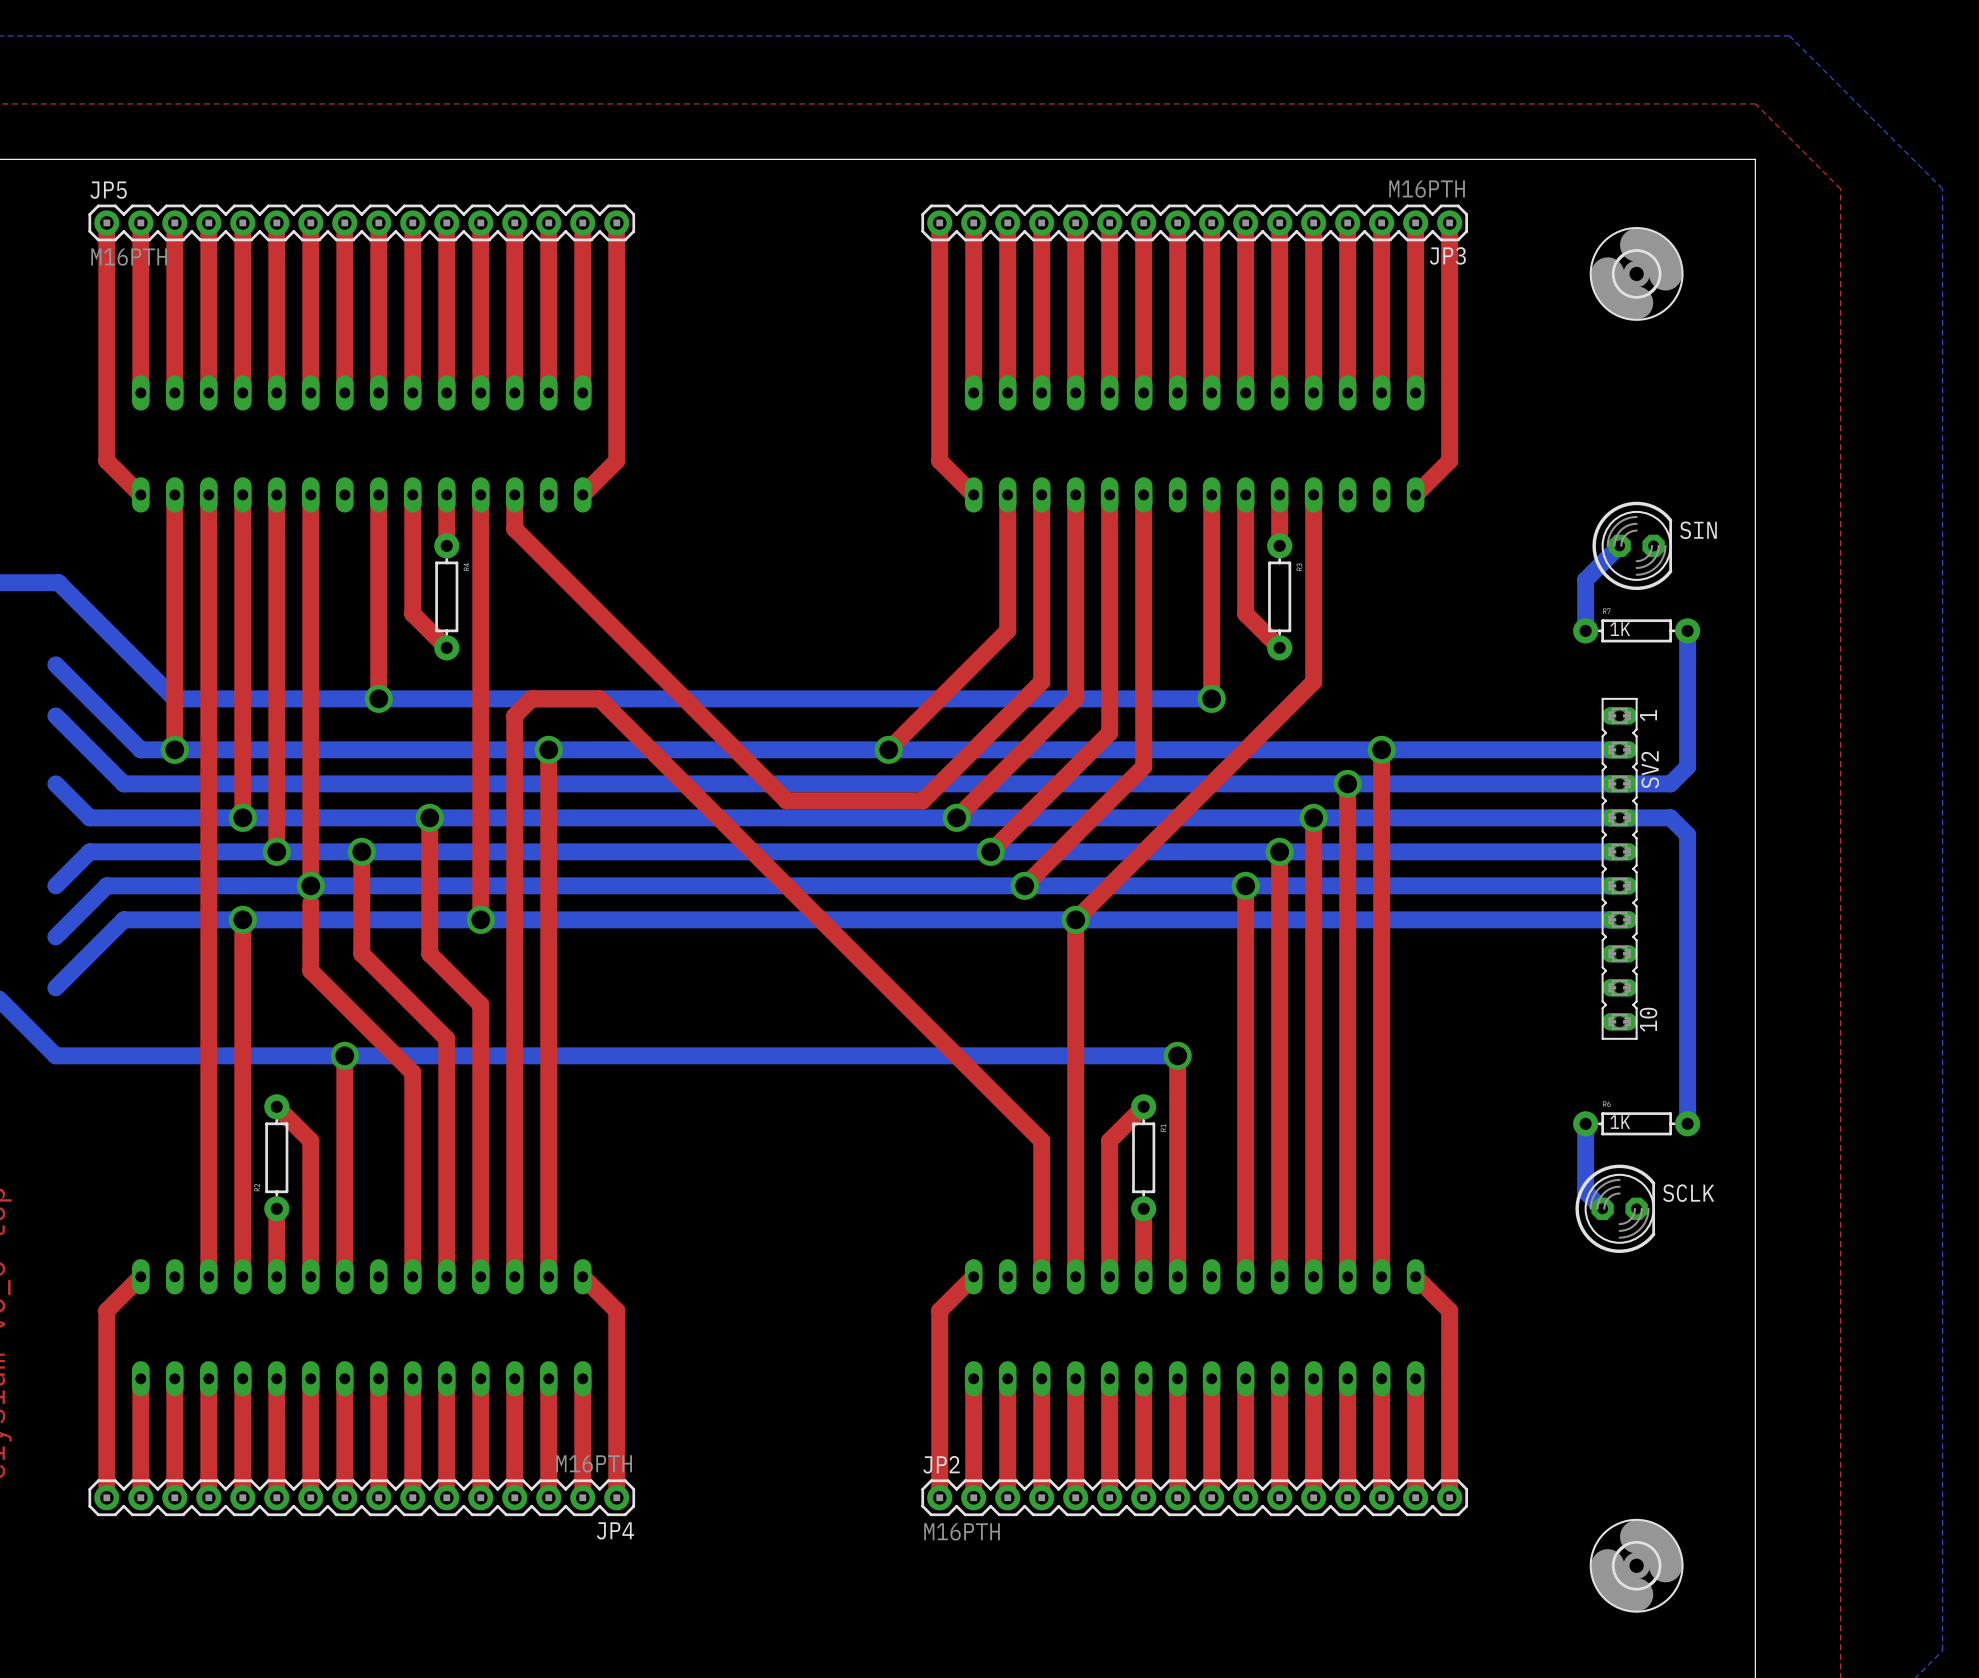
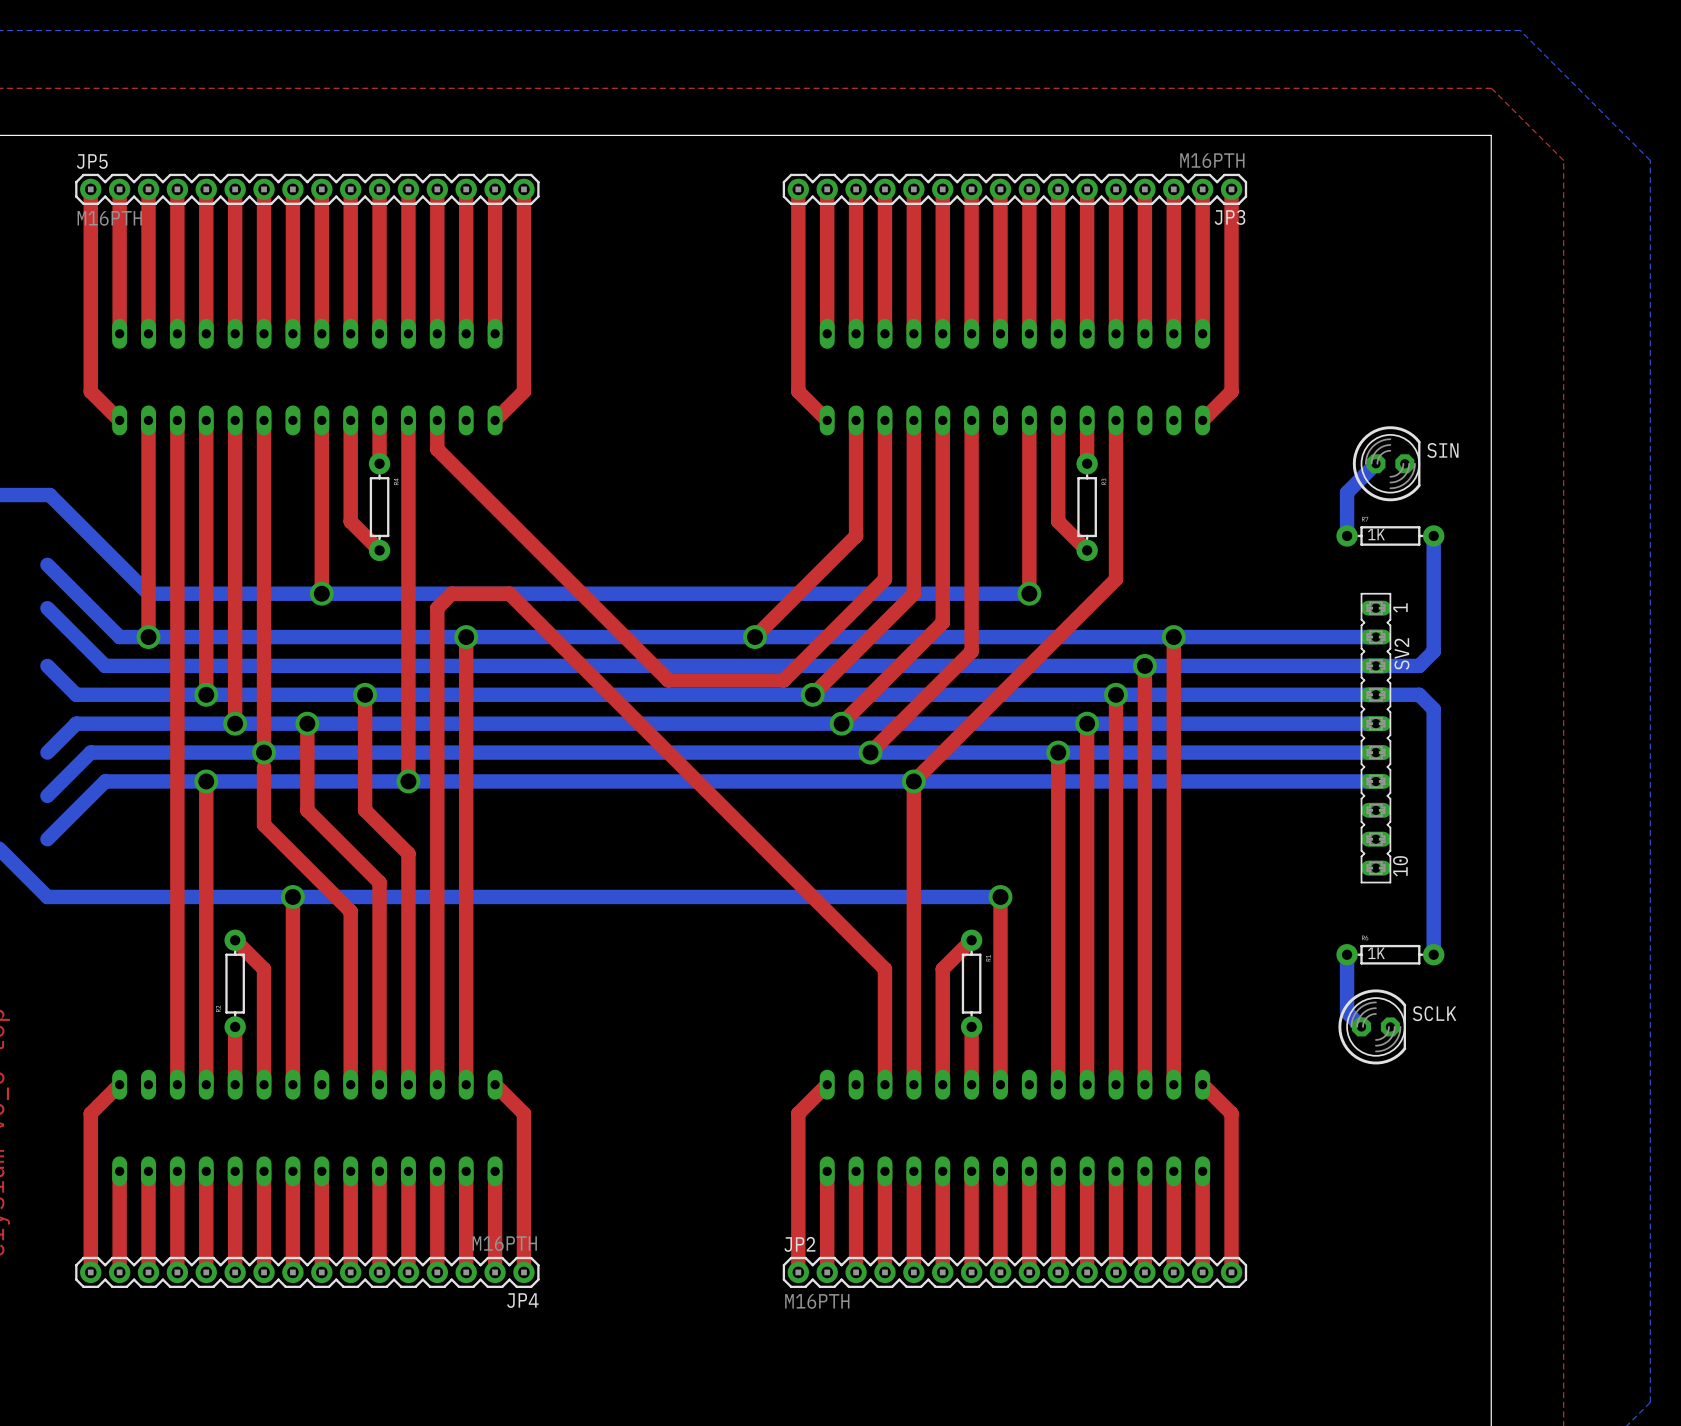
part: (1636, 273) -> none
part: (1636, 1565) -> none

